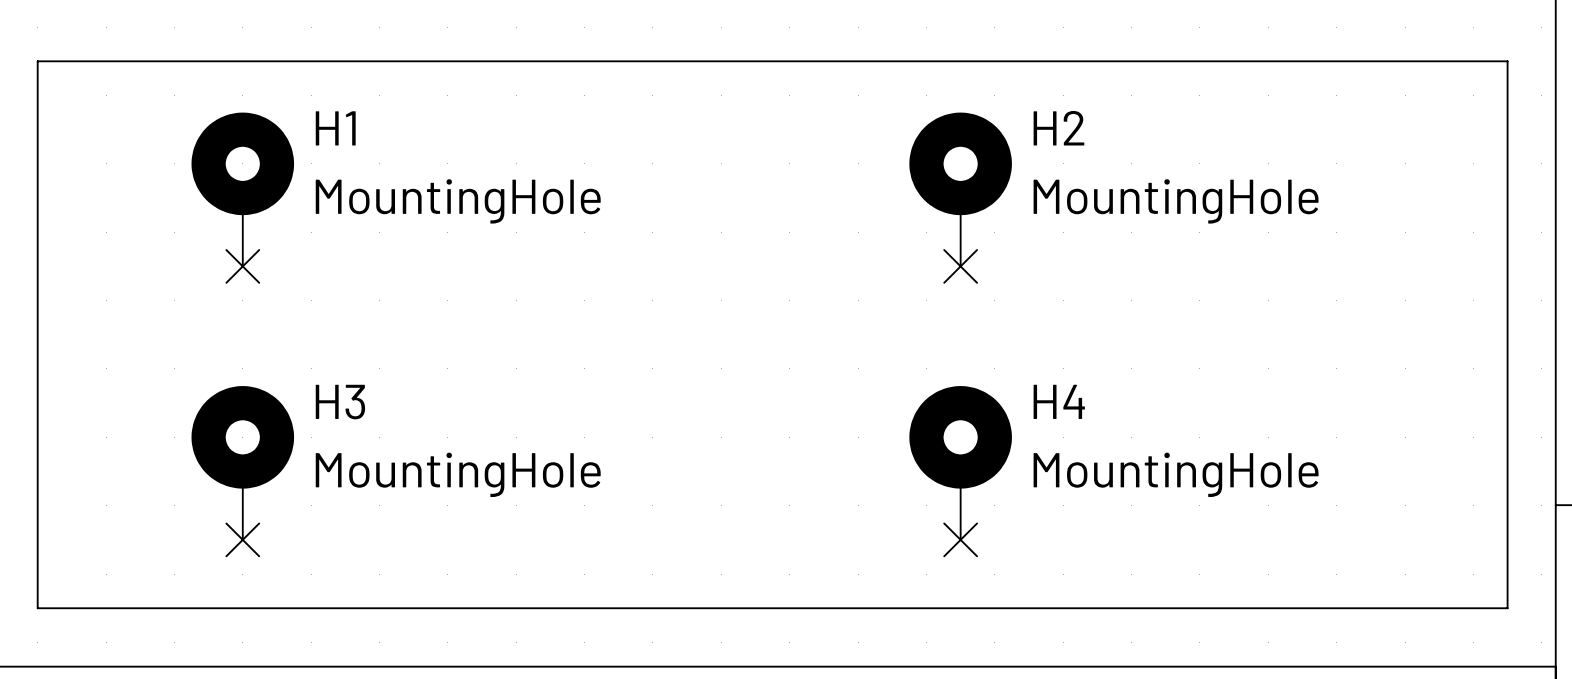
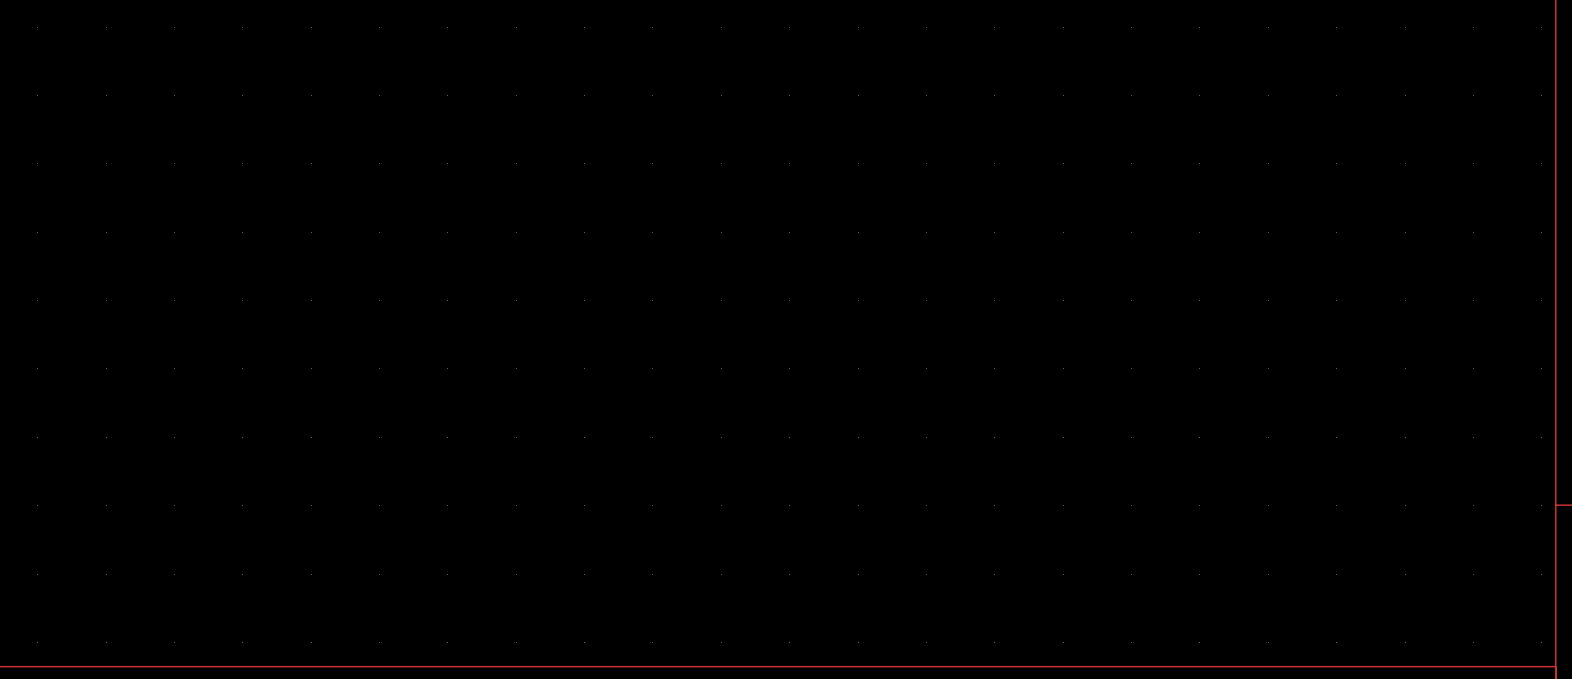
line: (37, 61) (1507, 61) (1507, 608) (37, 608) (37, 61) -> none
H1: MountingHole (242, 189) -> none
H2: MountingHole (960, 189) -> none
no-connect mark: (242, 266) -> none
no-connect mark: (960, 266) -> none
H3: MountingHole (242, 462) -> none
H4: MountingHole (960, 462) -> none
no-connect mark: (242, 539) -> none
no-connect mark: (960, 539) -> none

